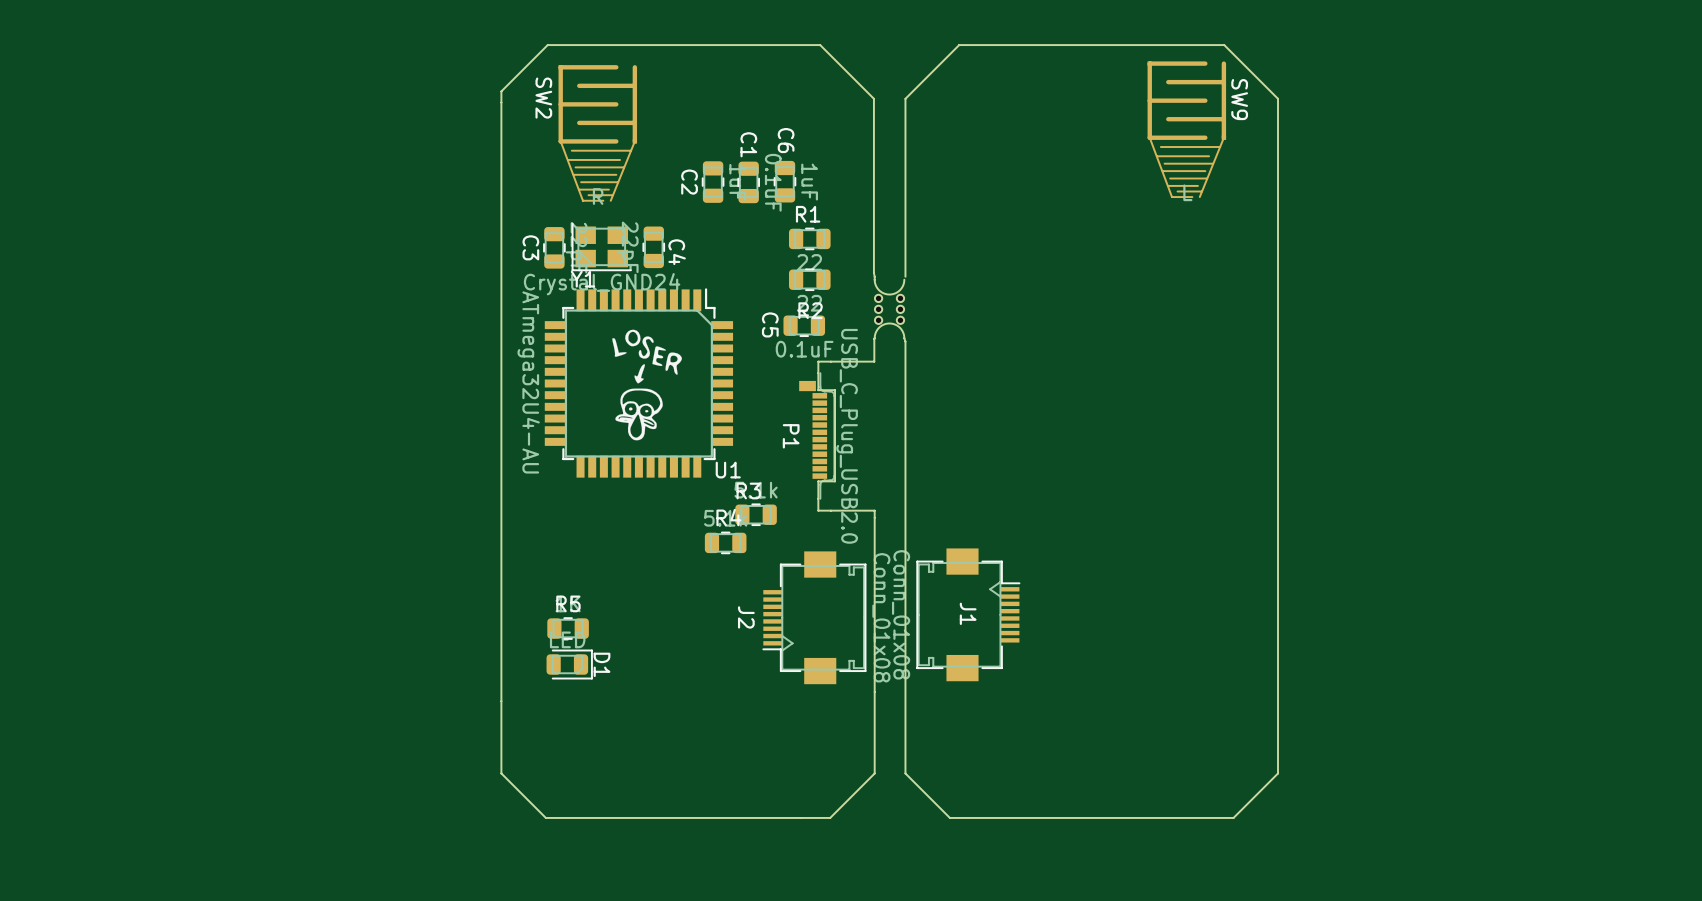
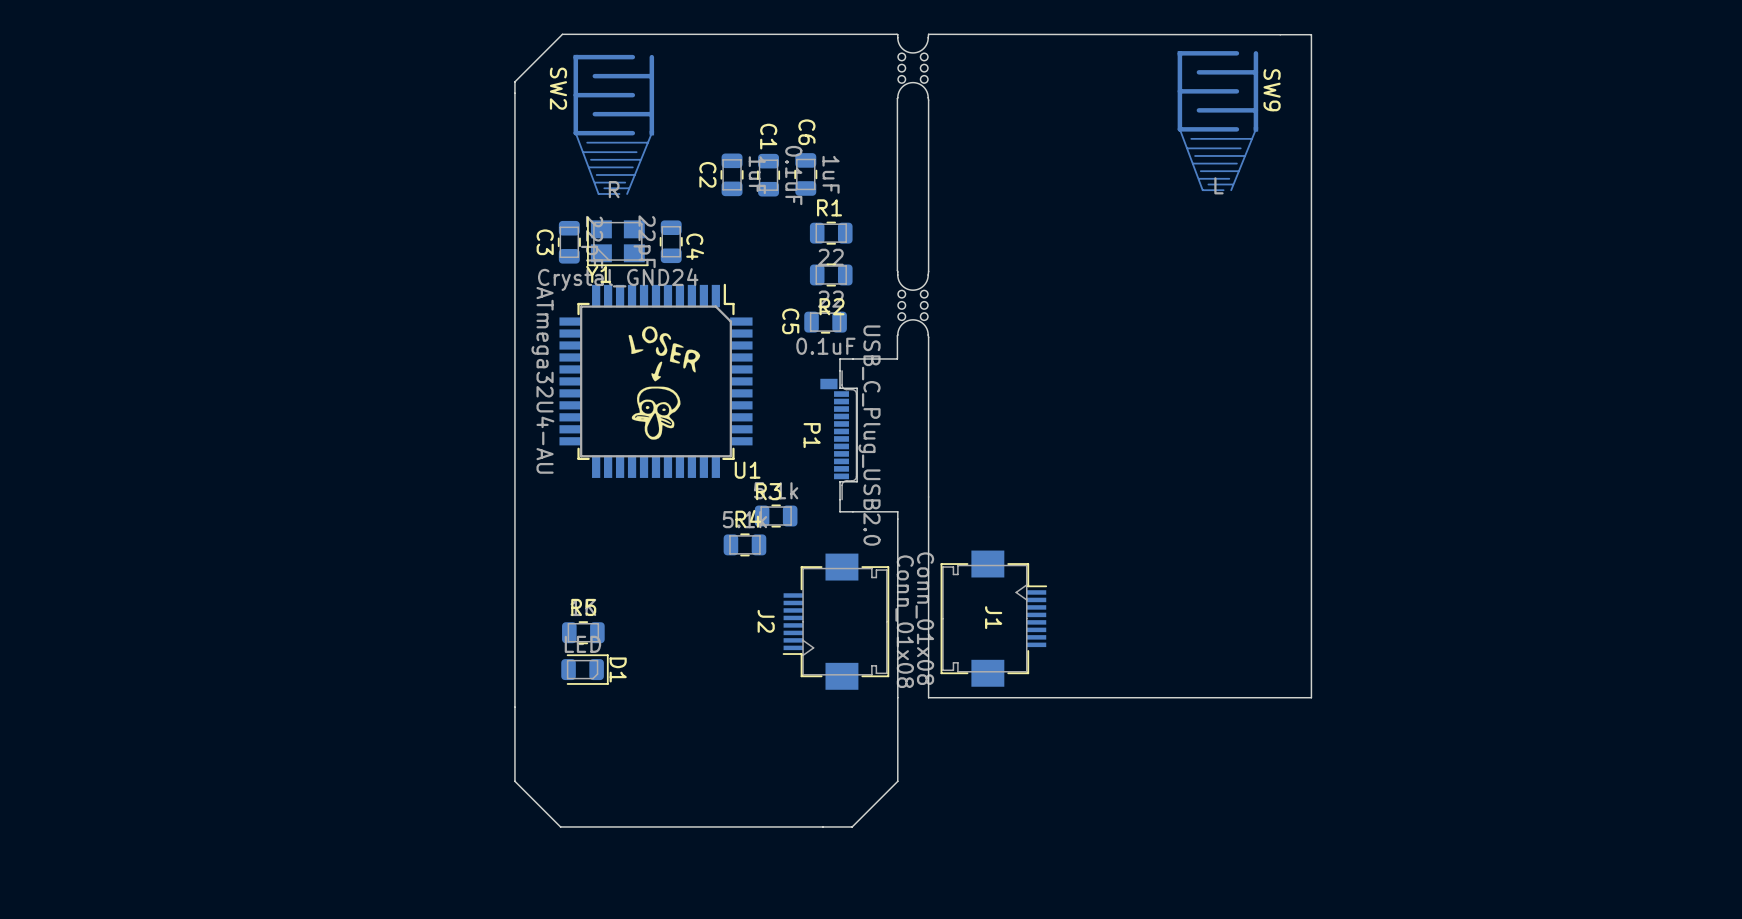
board edge: (820, 45) (873, 98) (874, 276) -> (928, 274) (928, 100) (925, 88) (914, 82) (907, 83) (902, 87) (897, 98) (897, 271)
part: none -> (913, 68)
board edge: (1278, 98) (1224, 45) (959, 45) (905, 98) (905, 276) -> (1311, 89) (1311, 34) (928, 34) (925, 47) (920, 50) (913, 52) (905, 50) (900, 47) (897, 34) (841, 34)
board edge: (904, 338) (905, 773) (949, 817) (1233, 817) (1278, 773) (1278, 691) -> (928, 335) (928, 697) (1311, 697)

